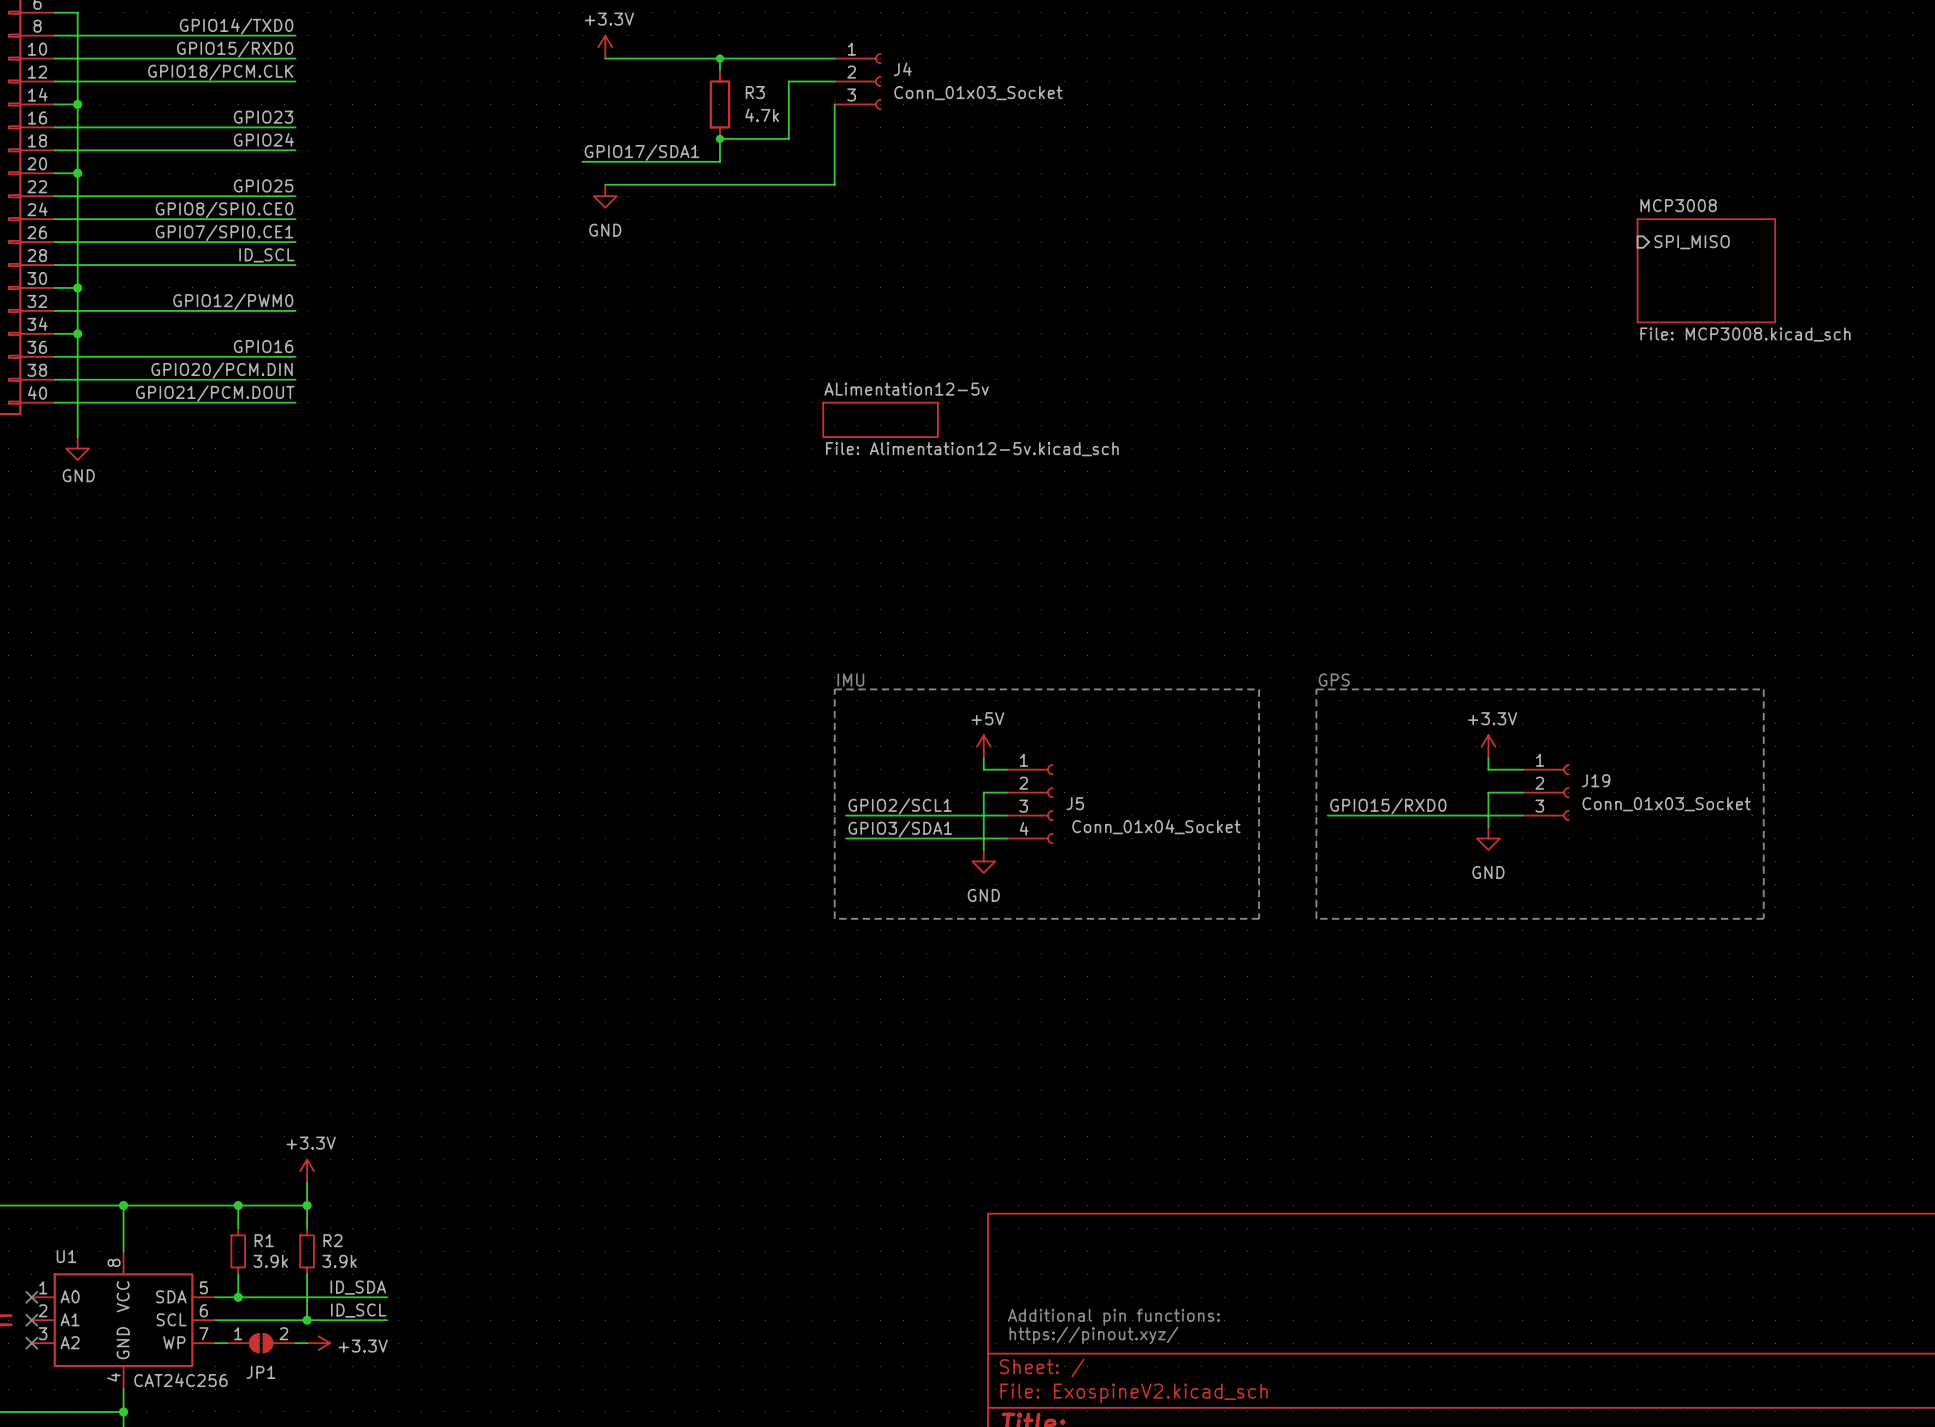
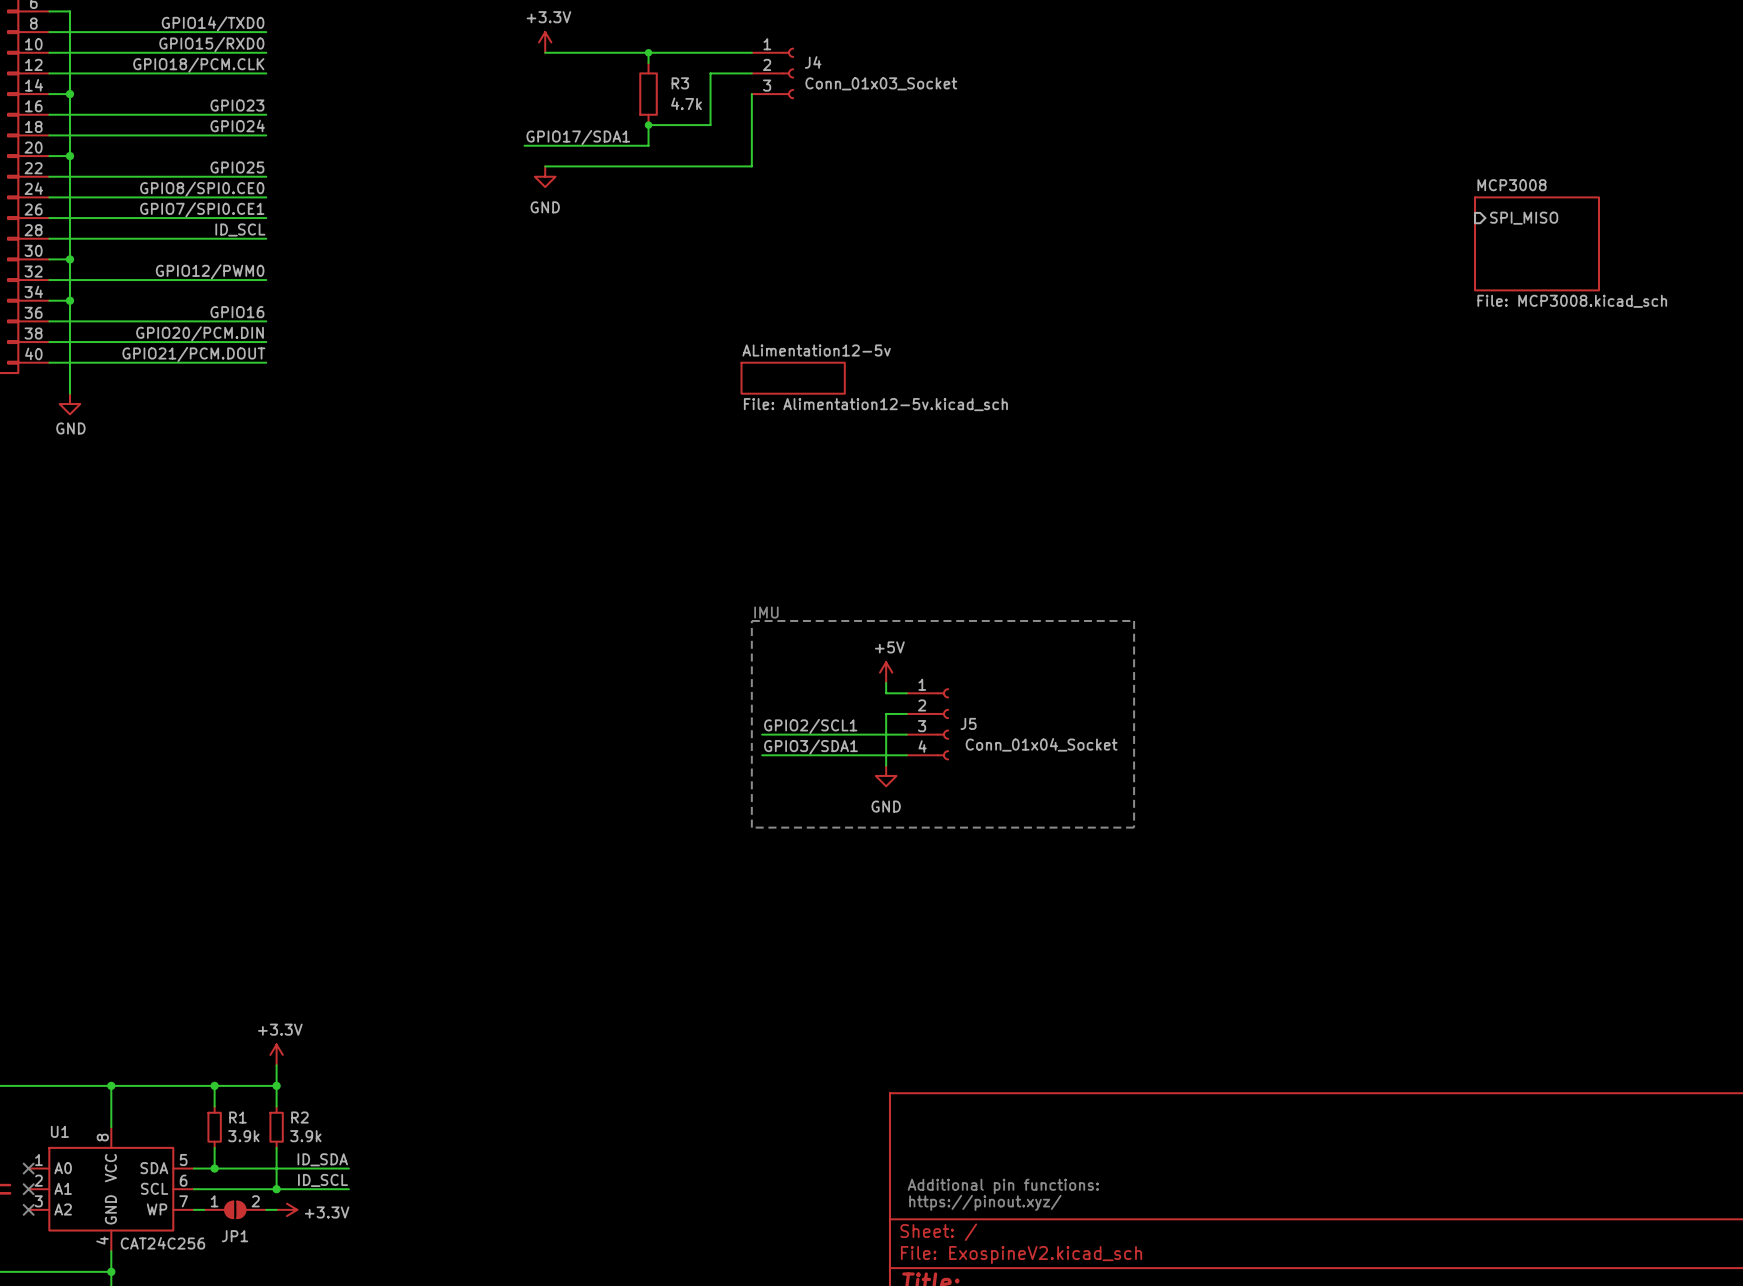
text: GPS (1334, 680) -> none
line: (1316, 689) (1763, 689) (1763, 918) (1316, 918) (1316, 689) -> none
power symbol: +3.3V (1488, 746) -> none
wire: (1488, 758) (1488, 769) (1522, 769) -> none
wire: (1522, 792) (1488, 792) (1488, 827) -> none
J19: Conn_01x03_Socket (1546, 792) -> none
label: GPIO15/RXD0 (1388, 806) -> none
wire: (1327, 815) (1522, 815) -> none
power symbol: GND (1488, 838) -> none

